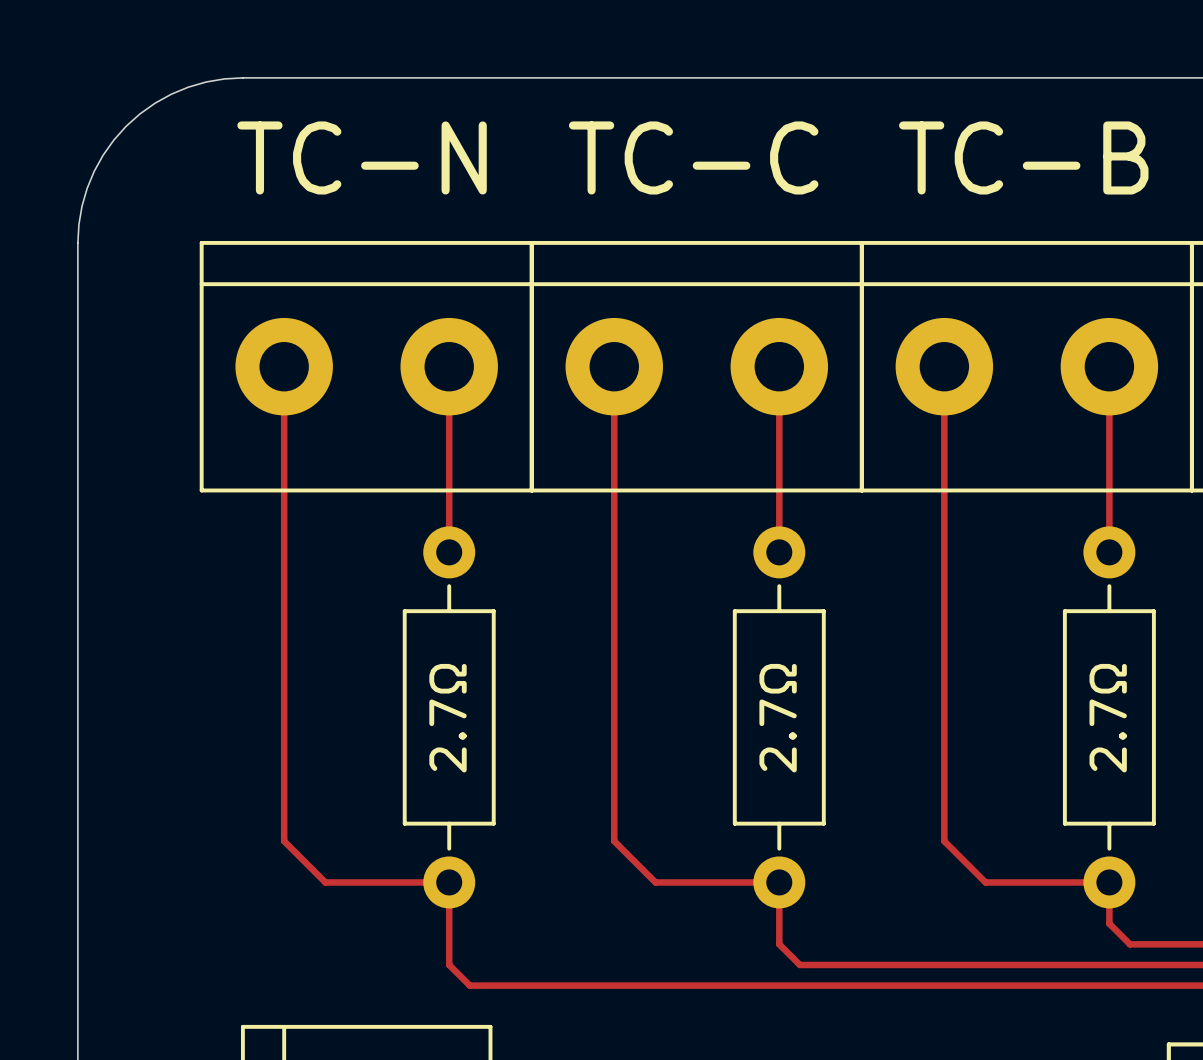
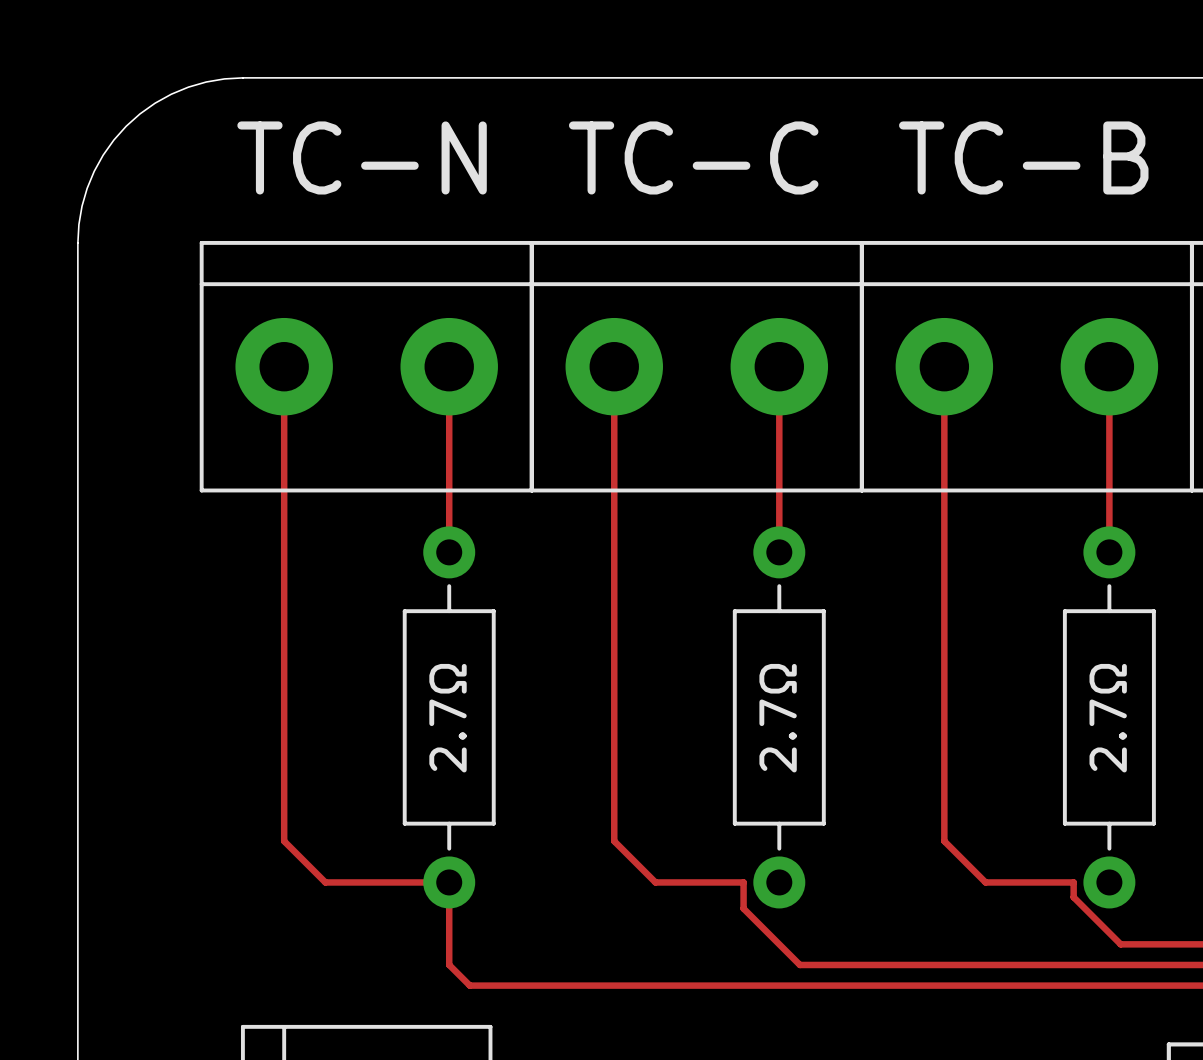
track: (743, 882) (779, 882) (779, 944) -> (743, 882) (743, 908) (779, 944)
track: (1073, 882) (1109, 882) (1109, 923) (1130, 944) -> (1073, 882) (1073, 897) (1120, 944) (1130, 944)

